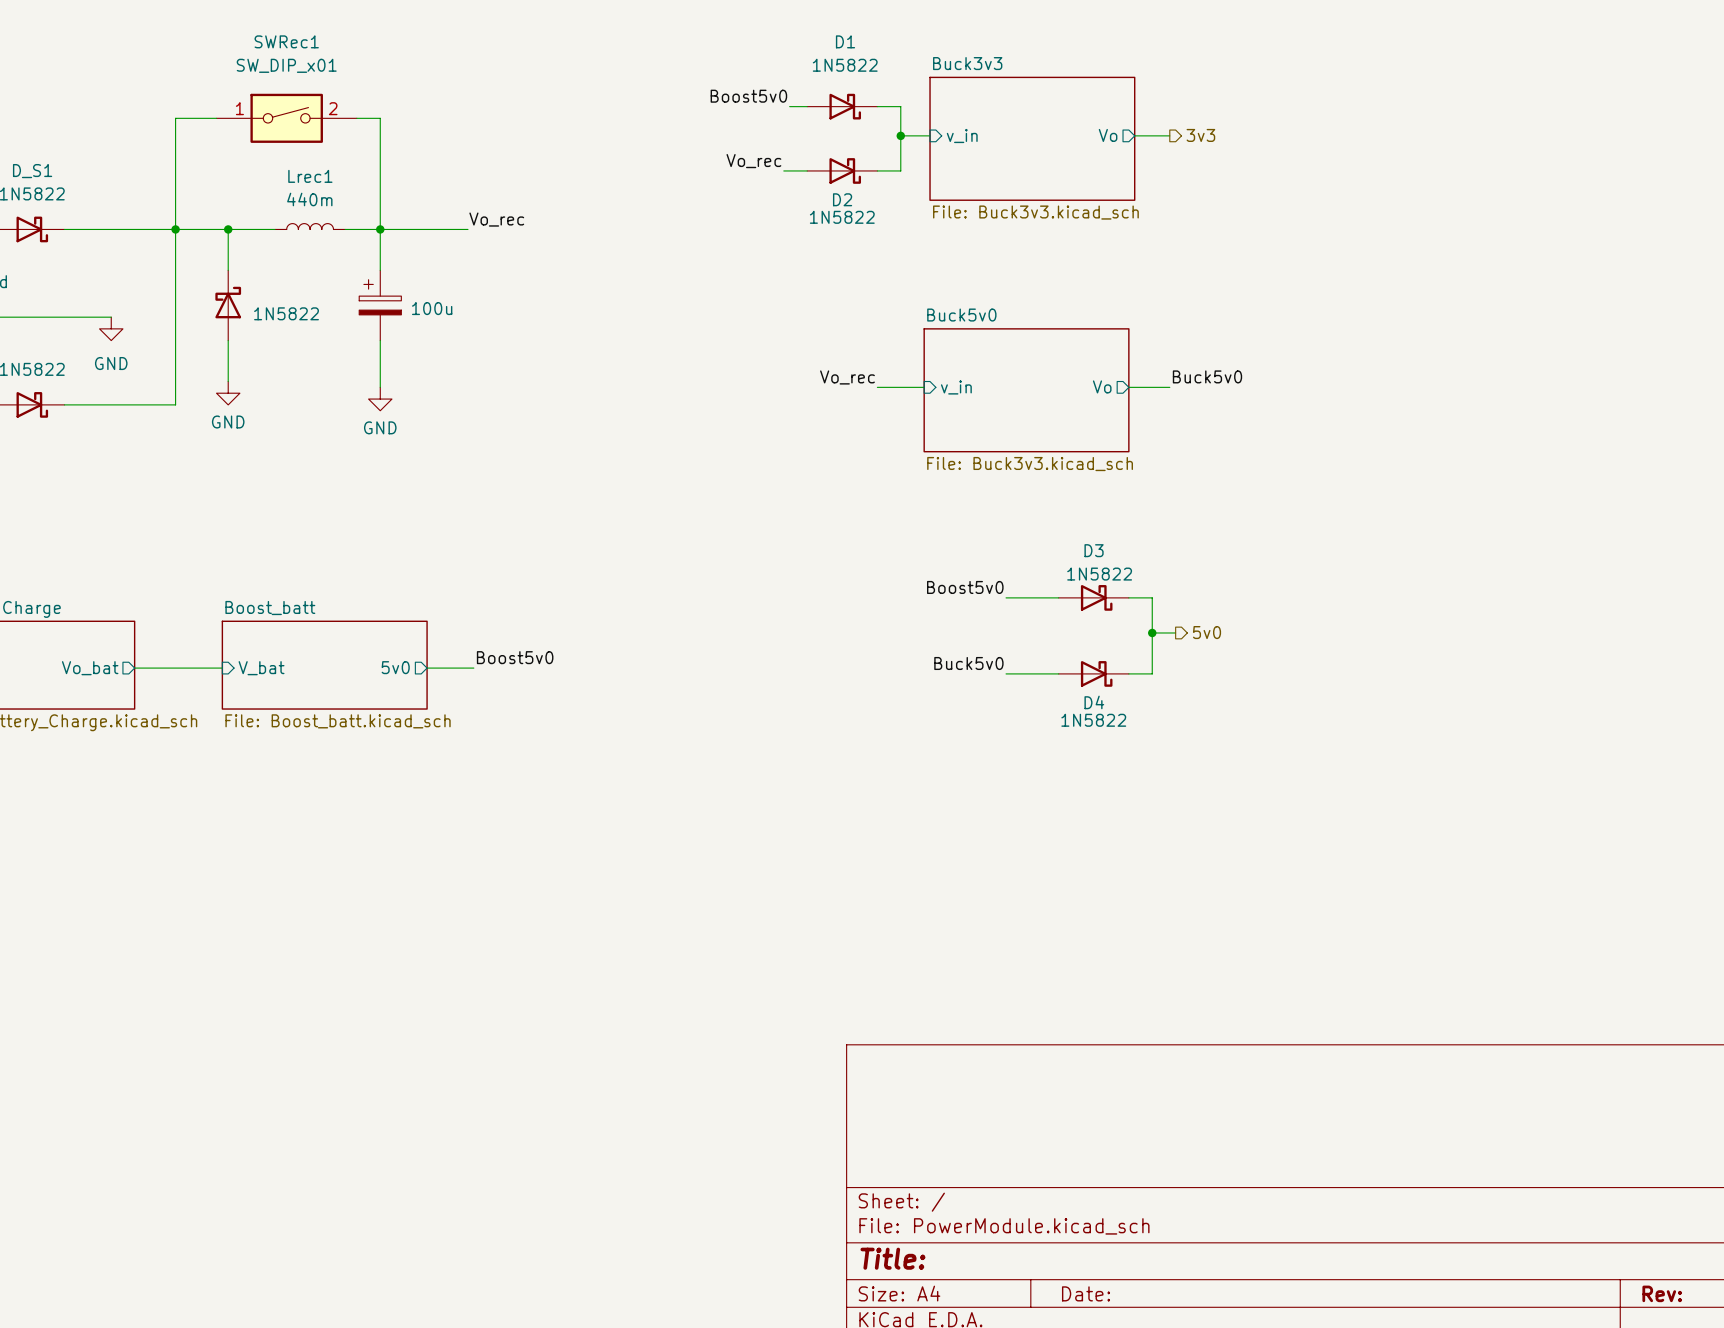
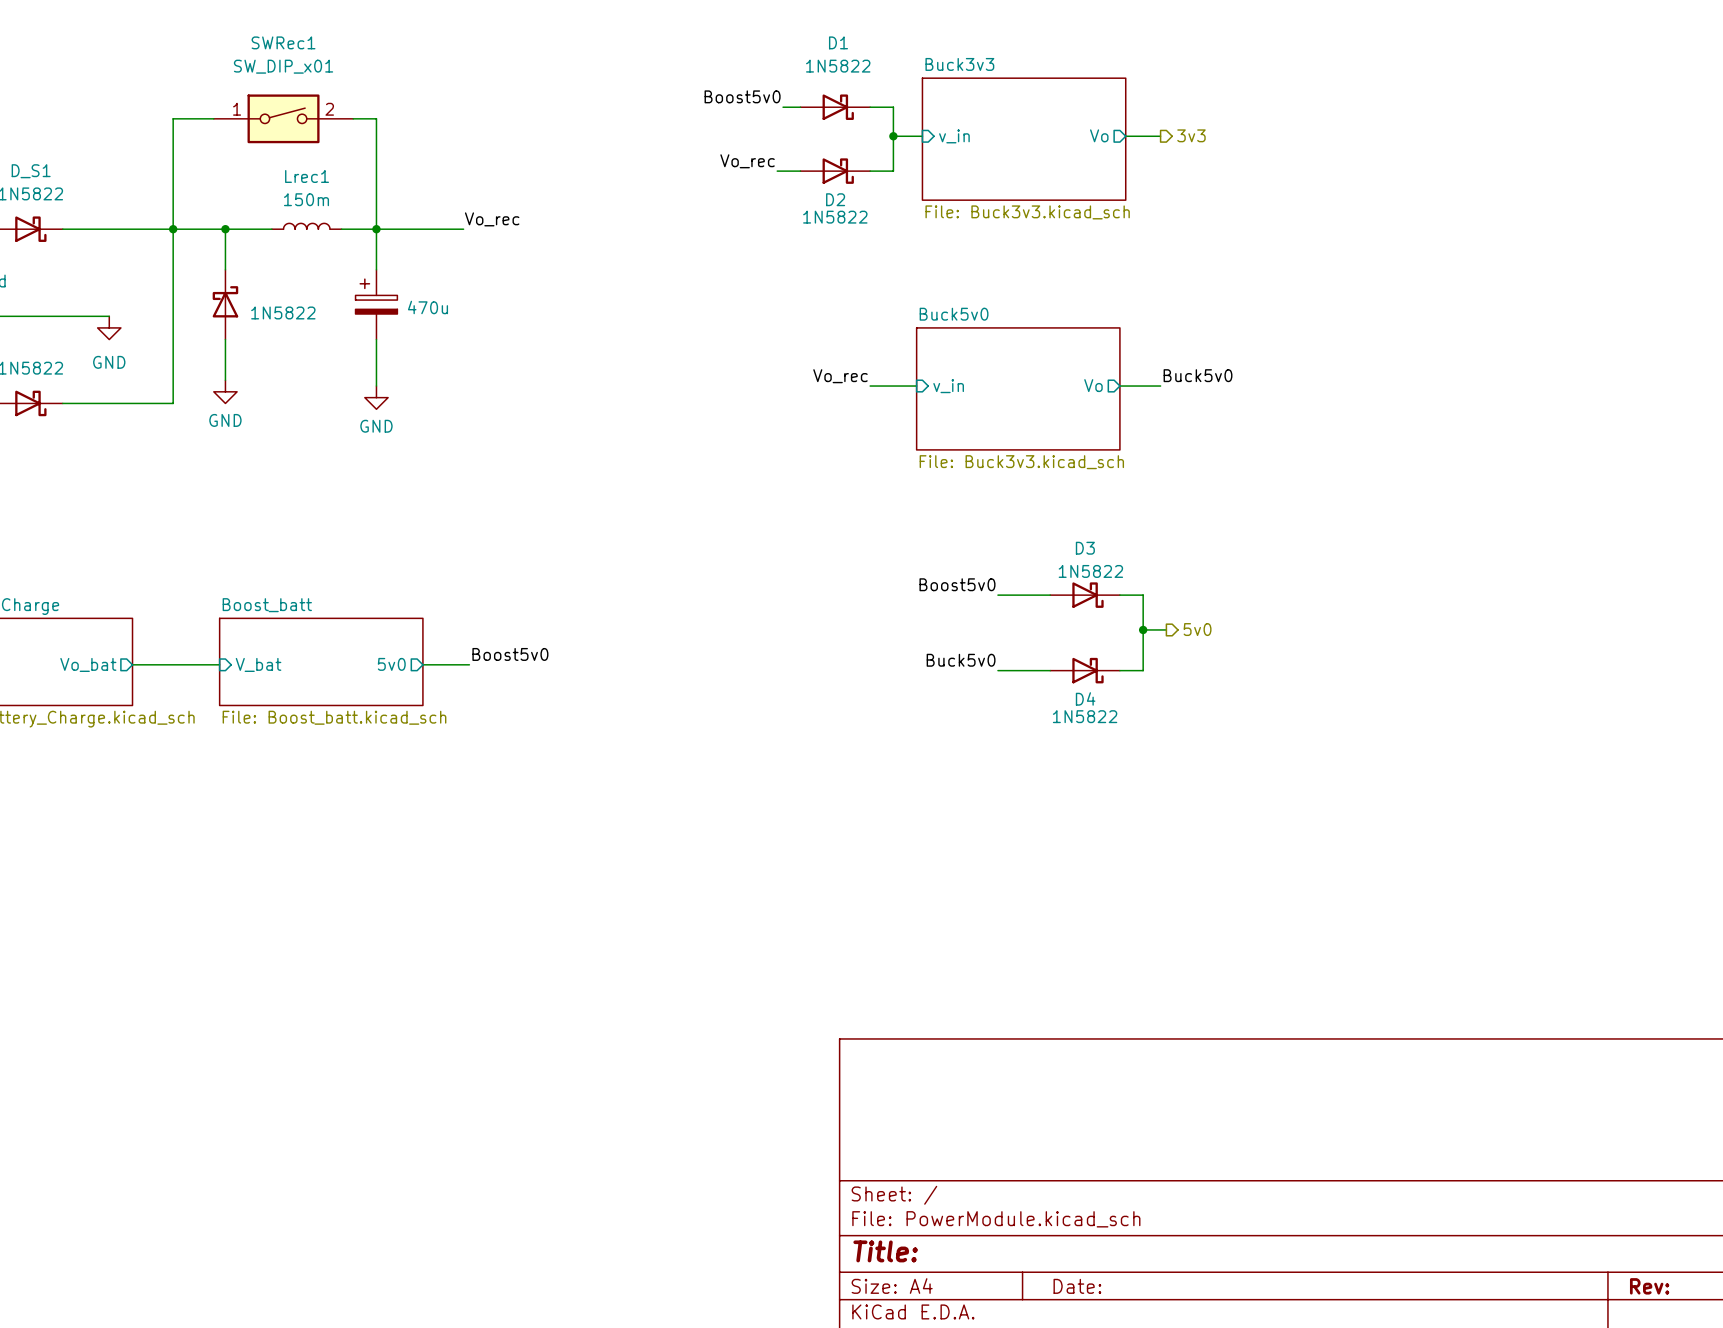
Lrec1 value: 440m (309, 199) -> 150m (306, 199)
part value: 100u (432, 308) -> 470u (427, 307)

